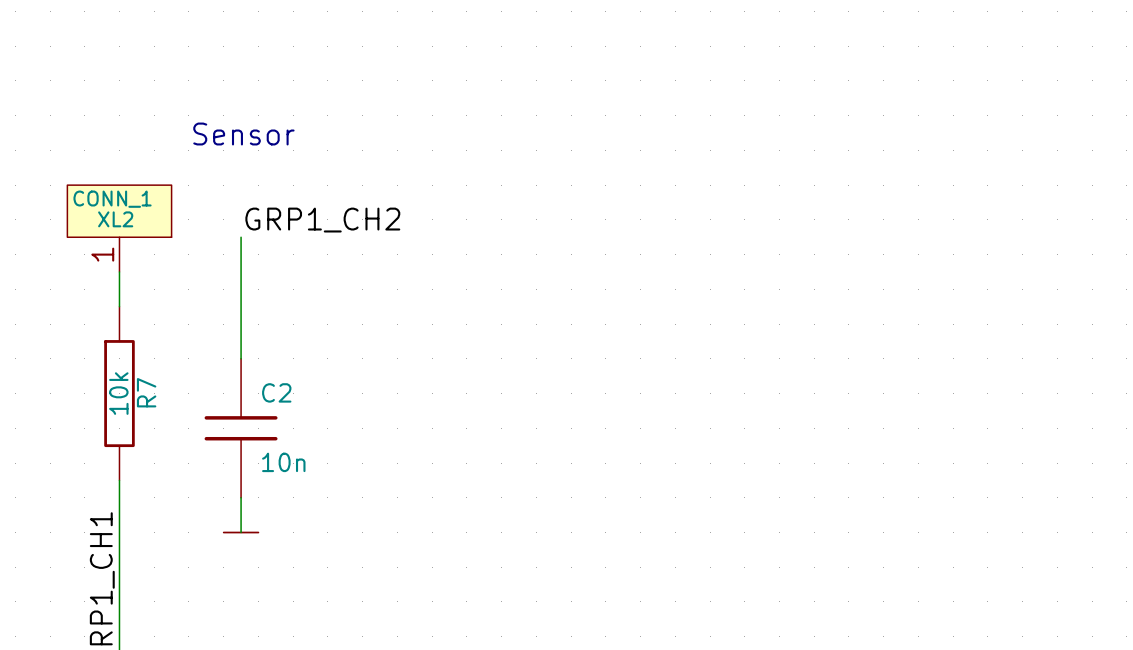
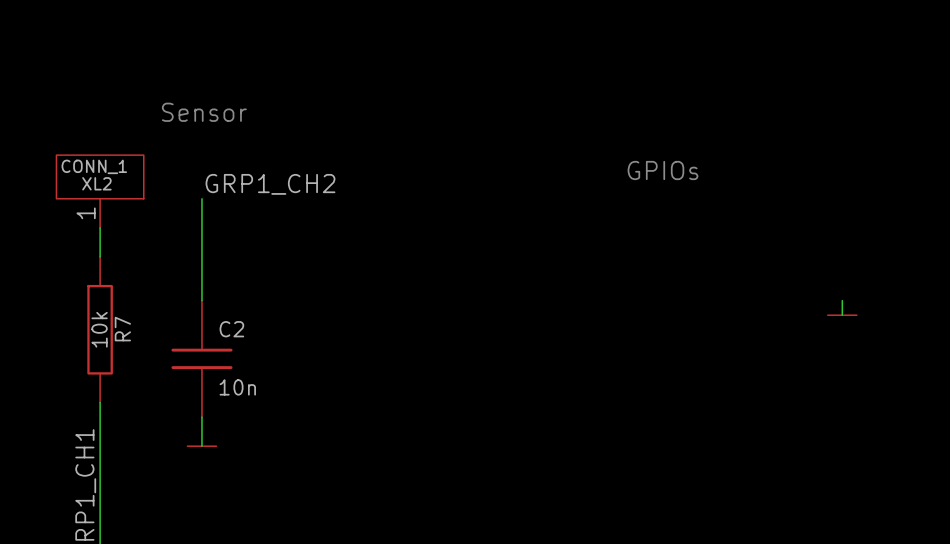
text: none -> GPIOs (663, 170)
wire: none -> (842, 300) (842, 315)
power symbol: none -> (842, 315)

